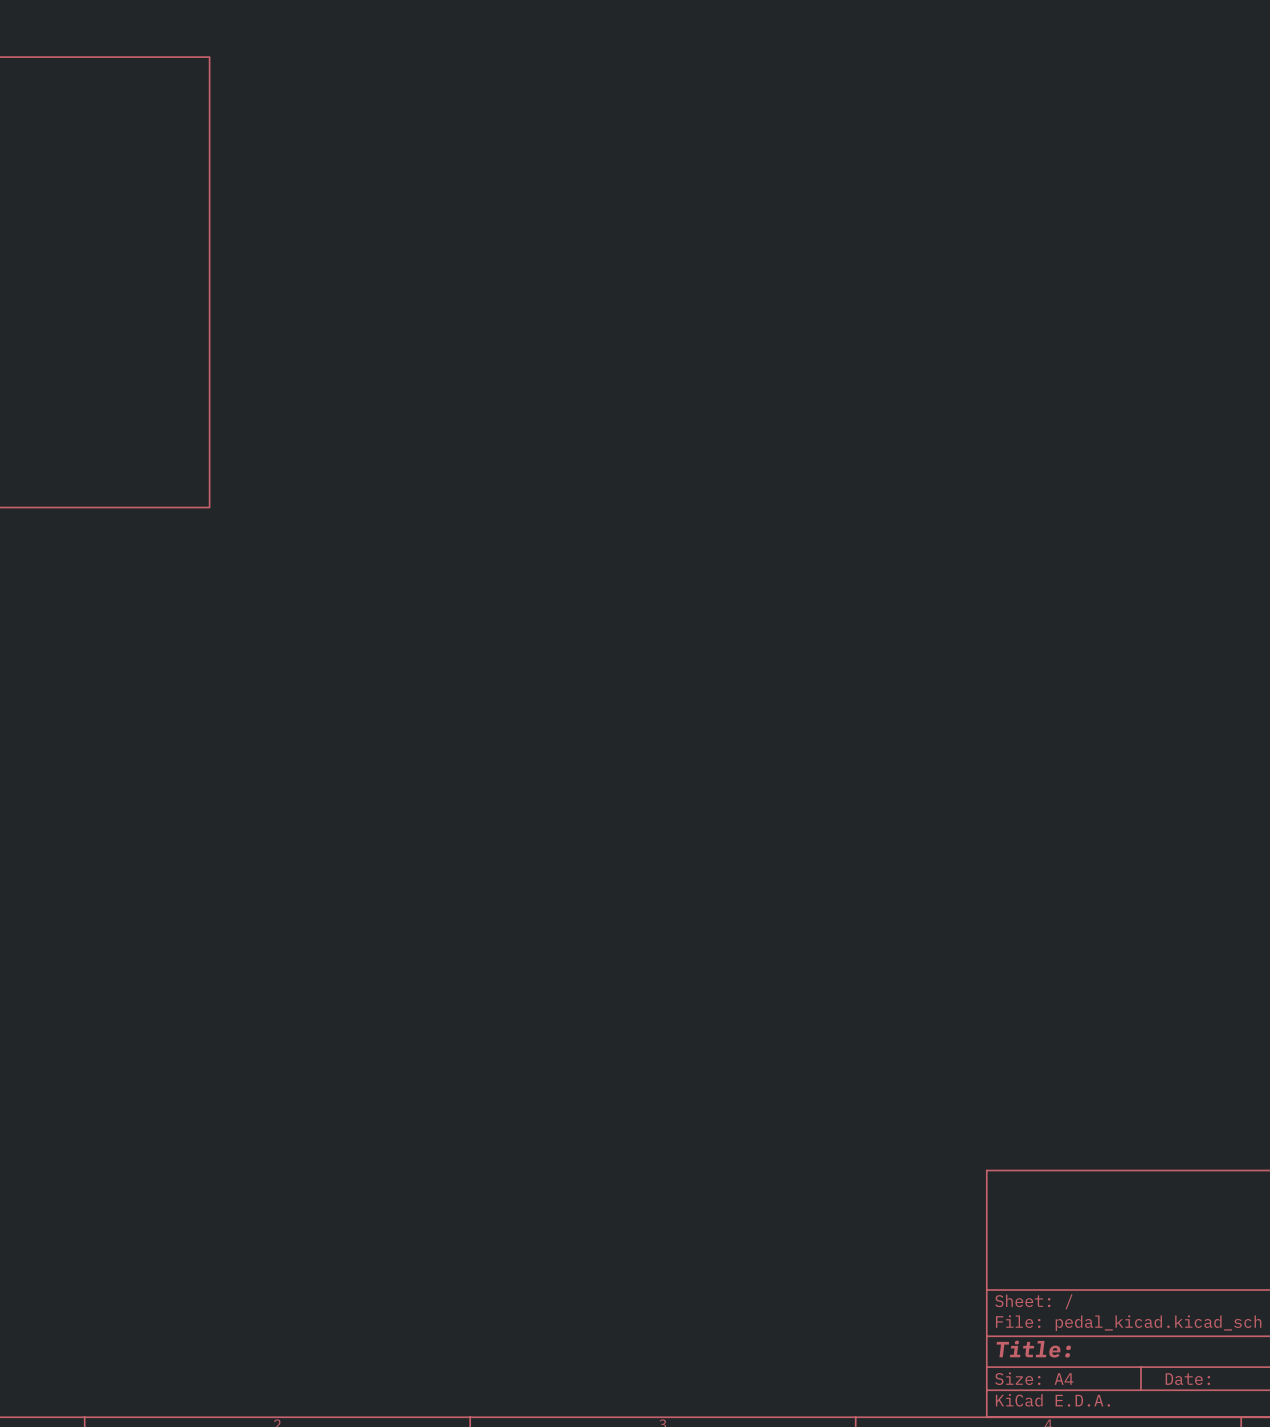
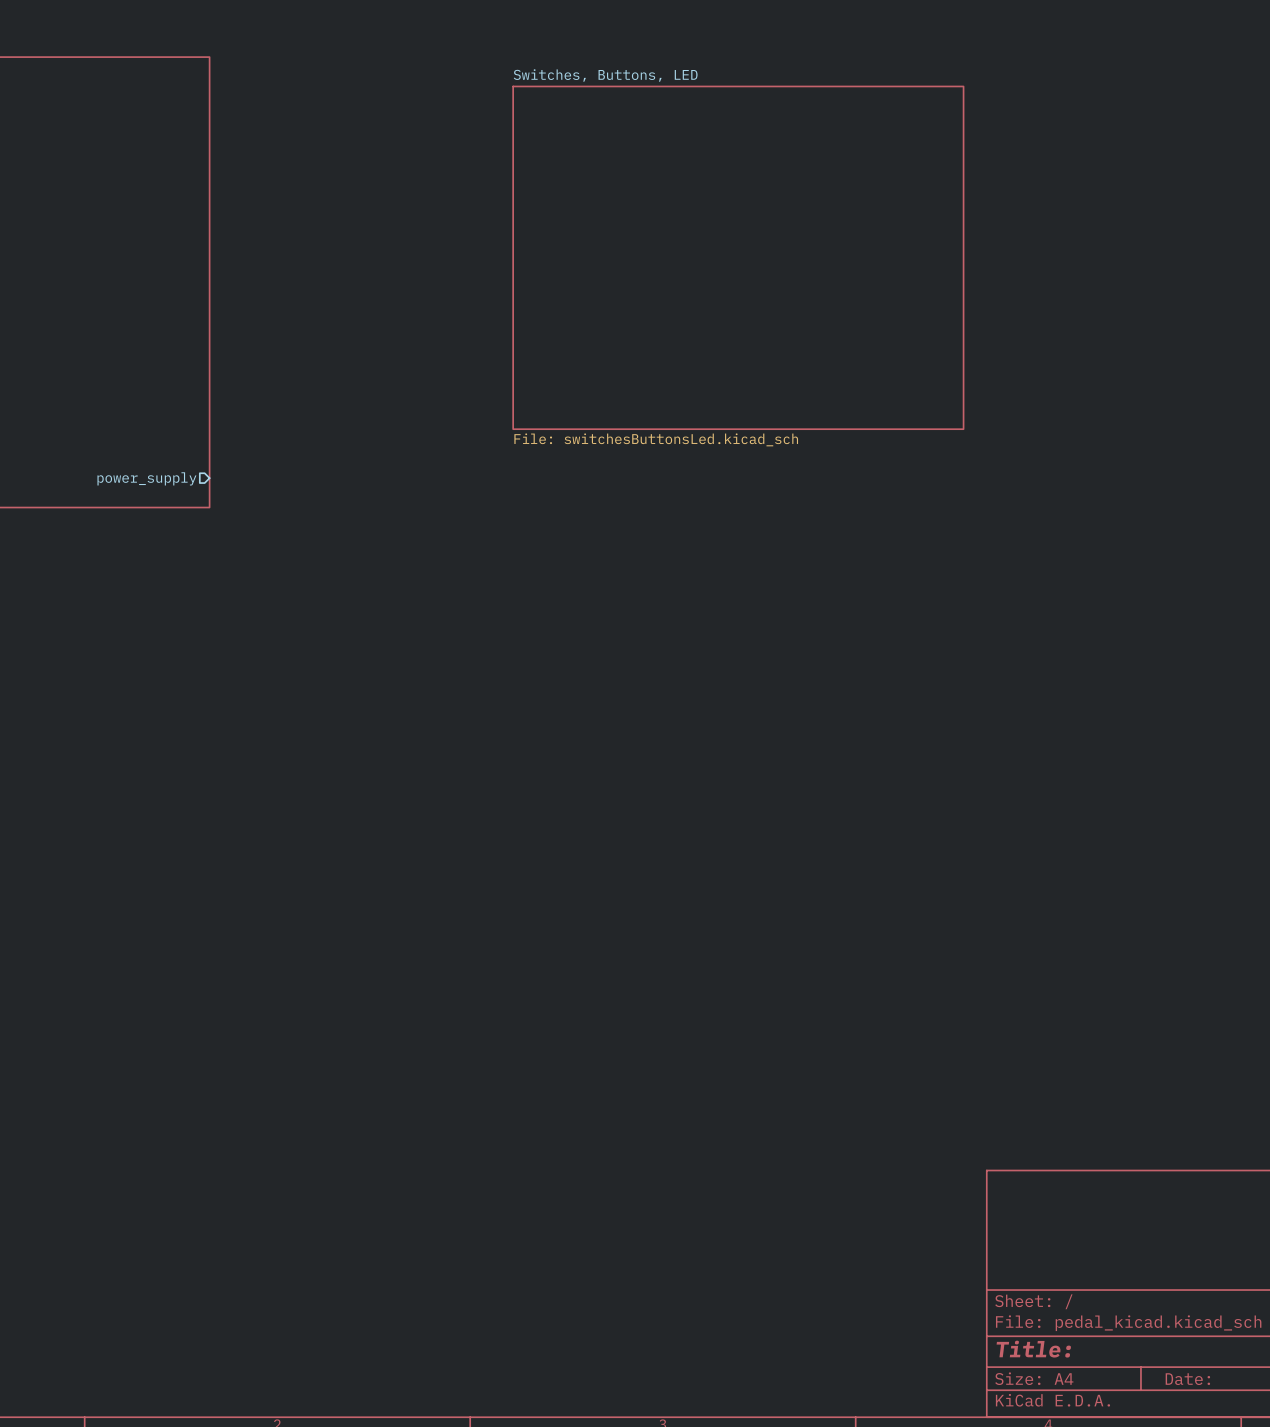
sheet Switches, Buttons, LED: none -> File: switchesButtonsLed.kicad_sch (738, 257)
sheet pin: none -> power_supply (146, 478)

